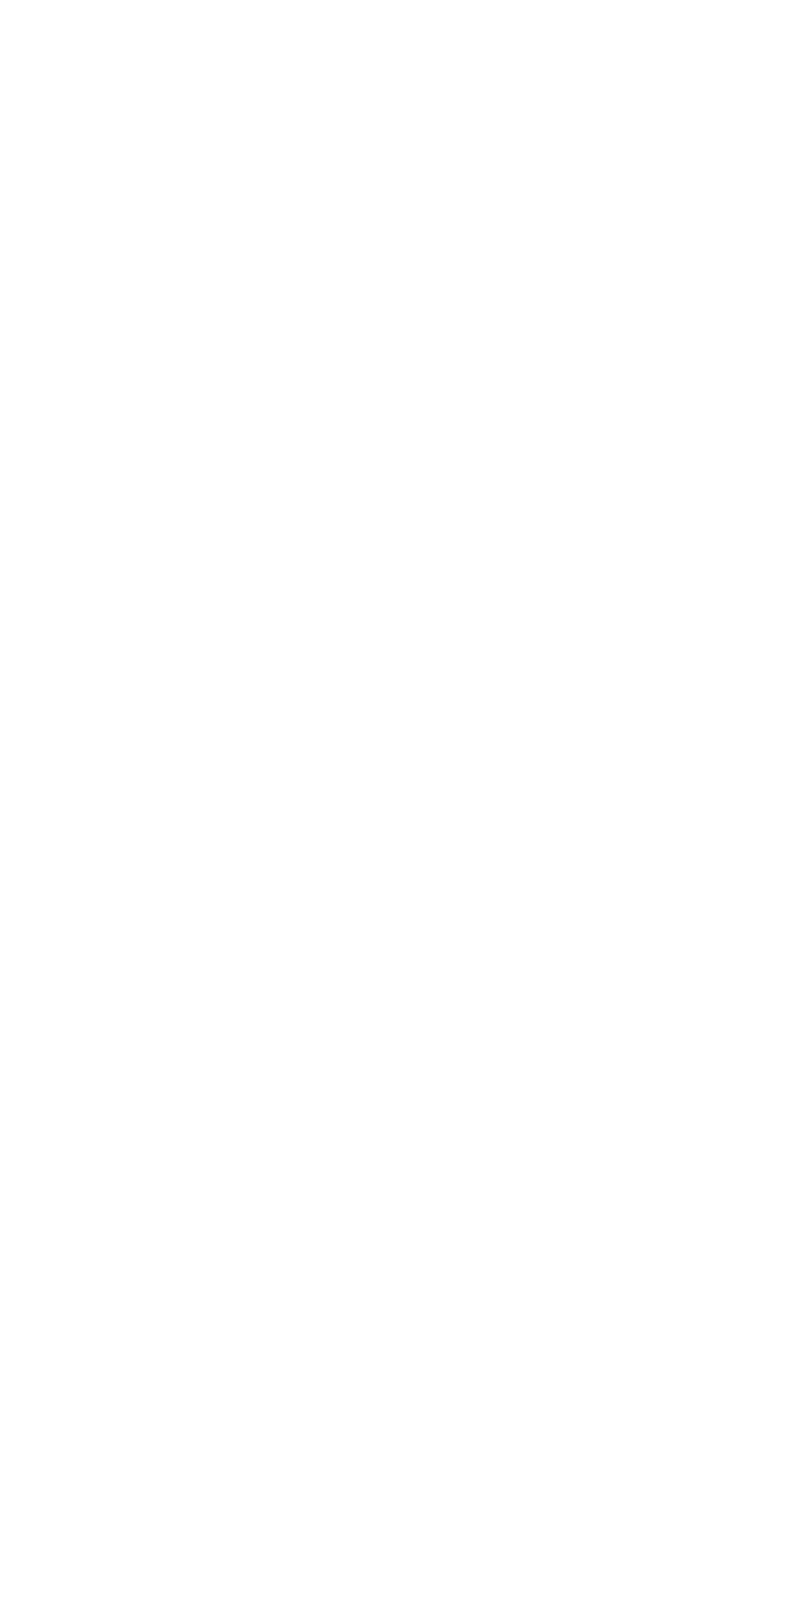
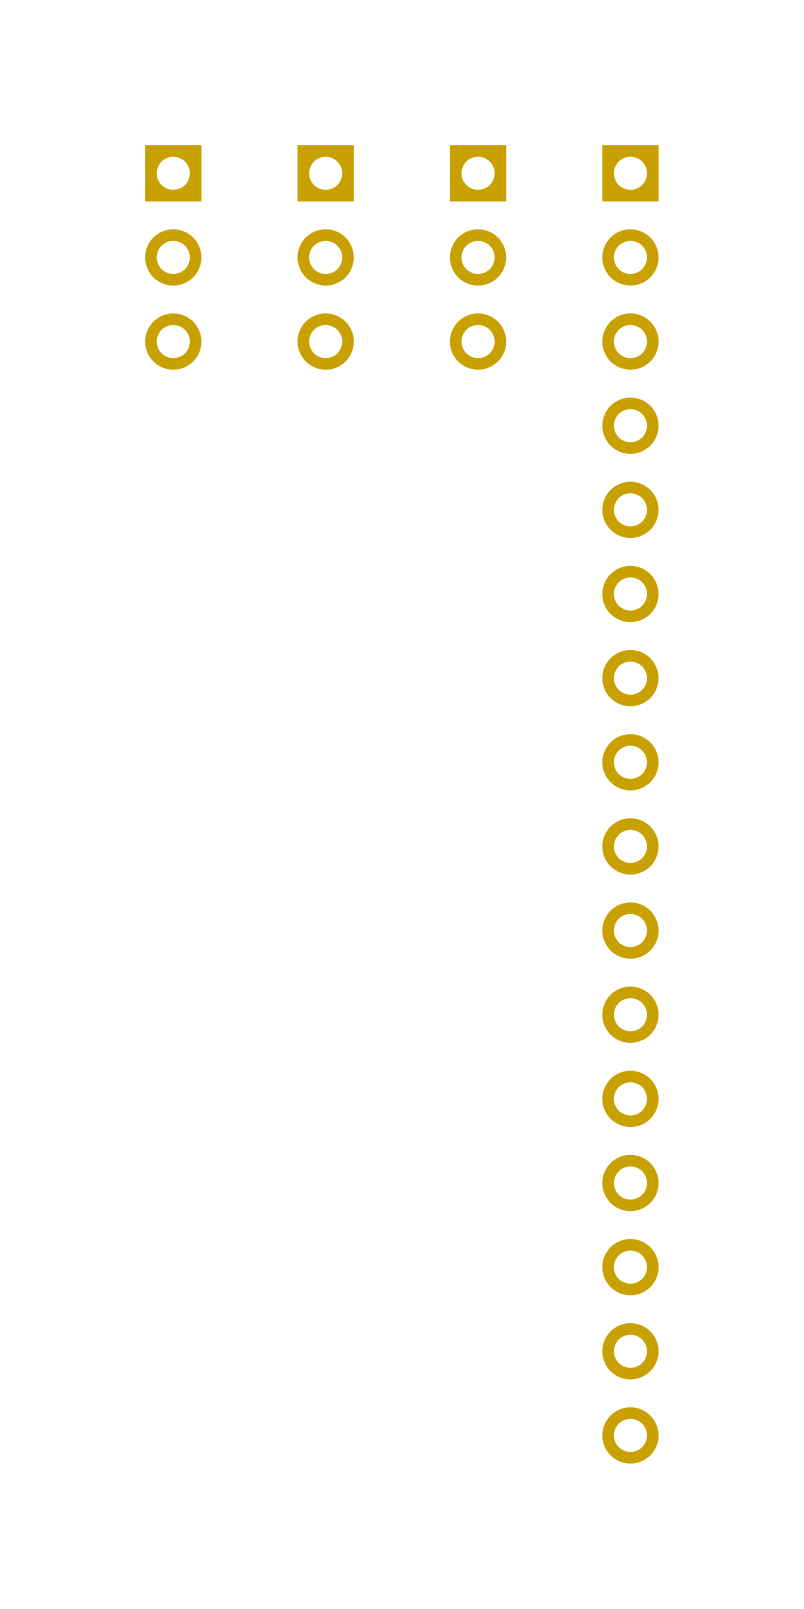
part: none -> (173, 257)
part: none -> (325, 257)
part: none -> (478, 257)
part: none -> (630, 804)

